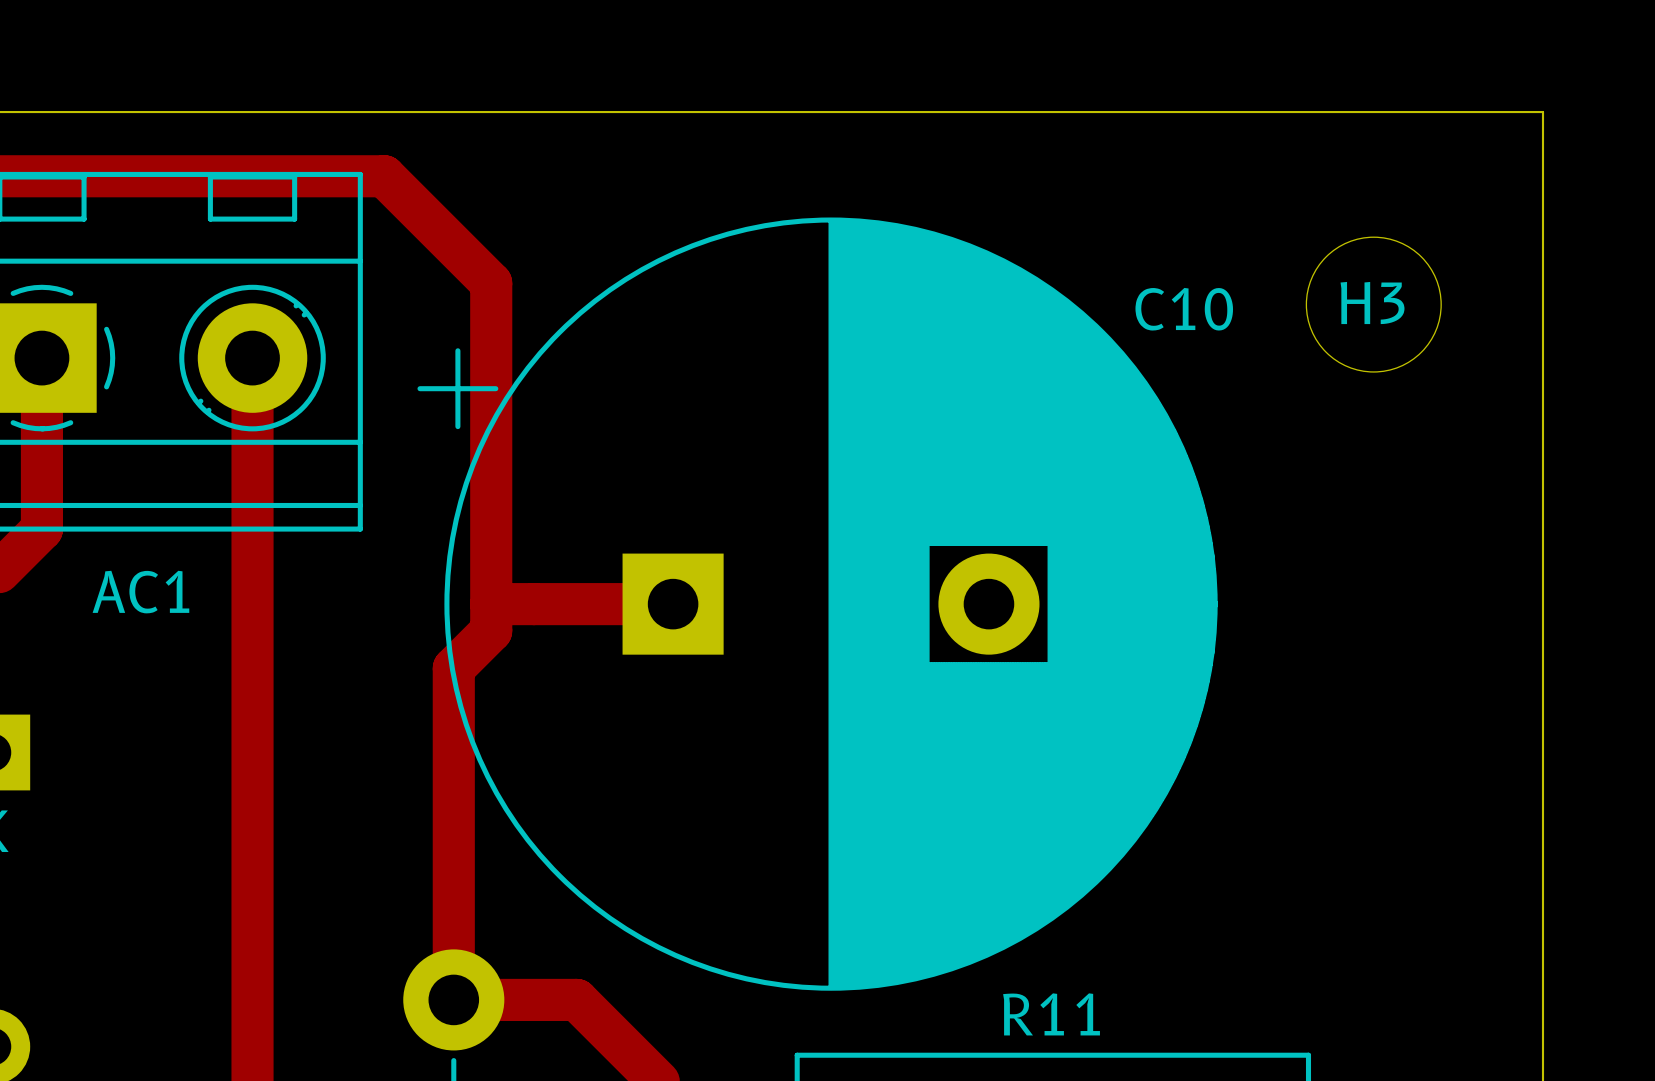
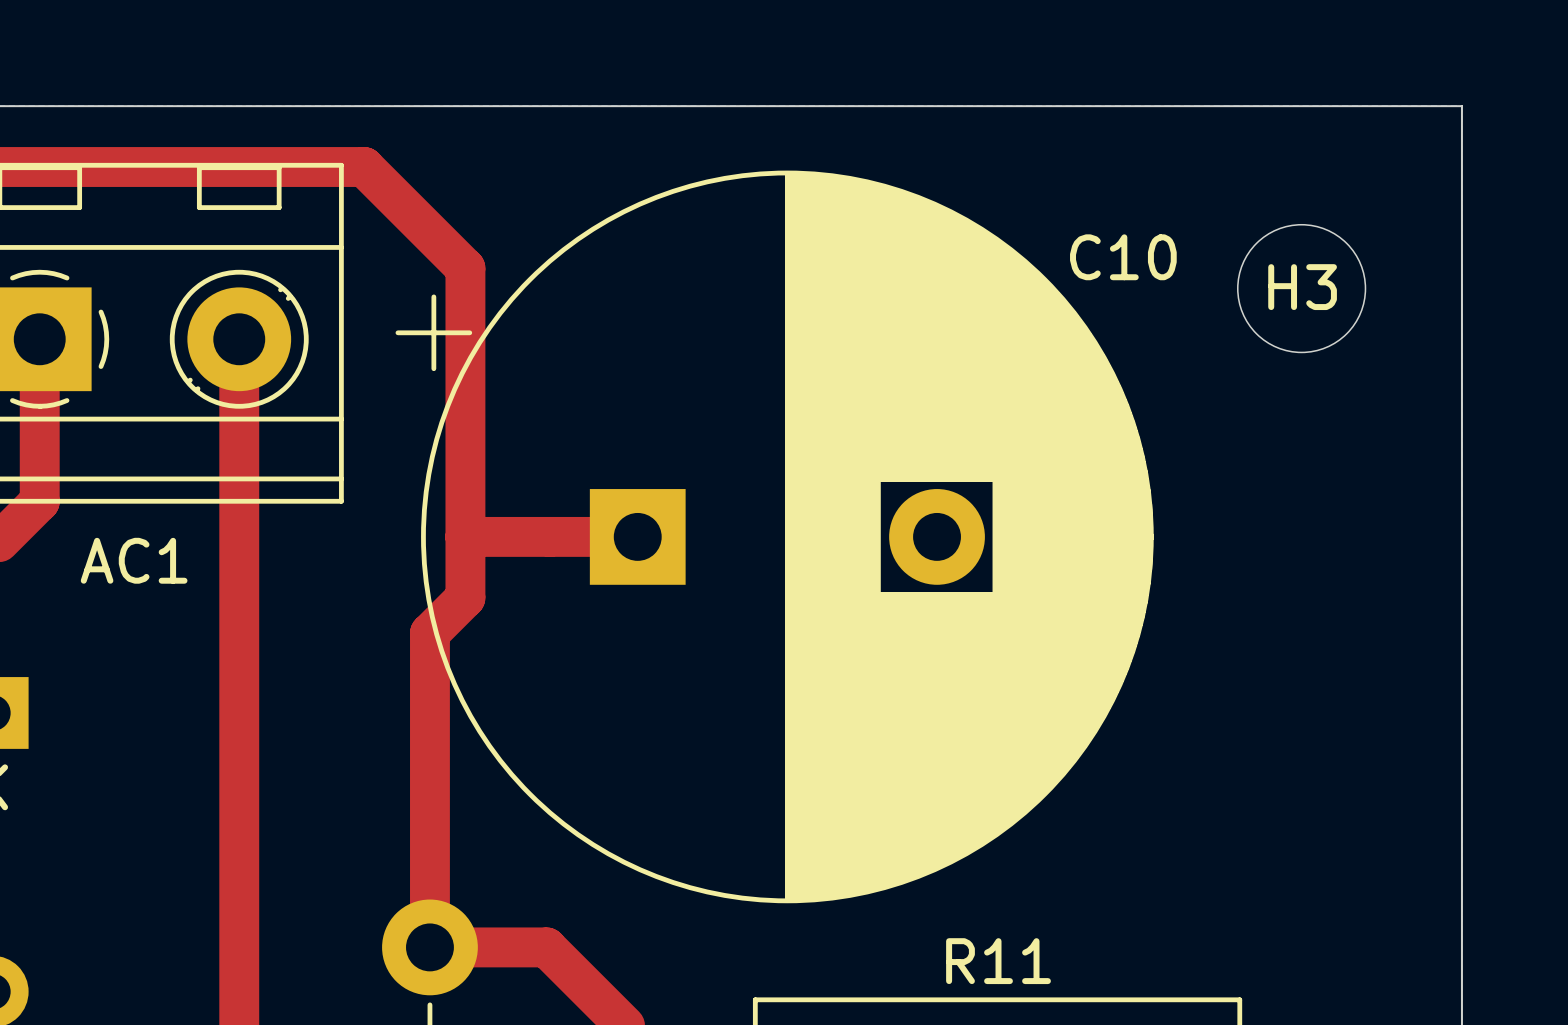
top track: (491, 604) (673, 604) -> (465, 536) (637, 536)
C10 position: (817, 604) -> (774, 536)

